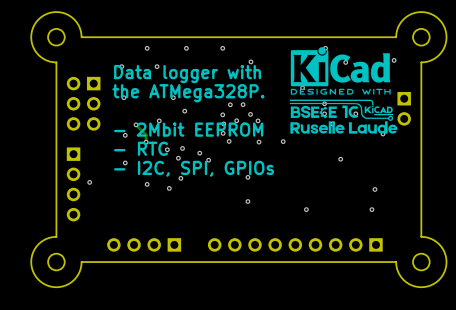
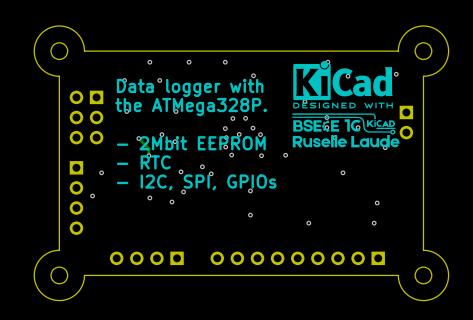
via: (184, 111) -> none
via: none -> (175, 141)
via: (125, 135) -> none
via: (182, 148) -> none
via: (167, 149) -> none
via: none -> (101, 172)
via: (125, 162) -> none

